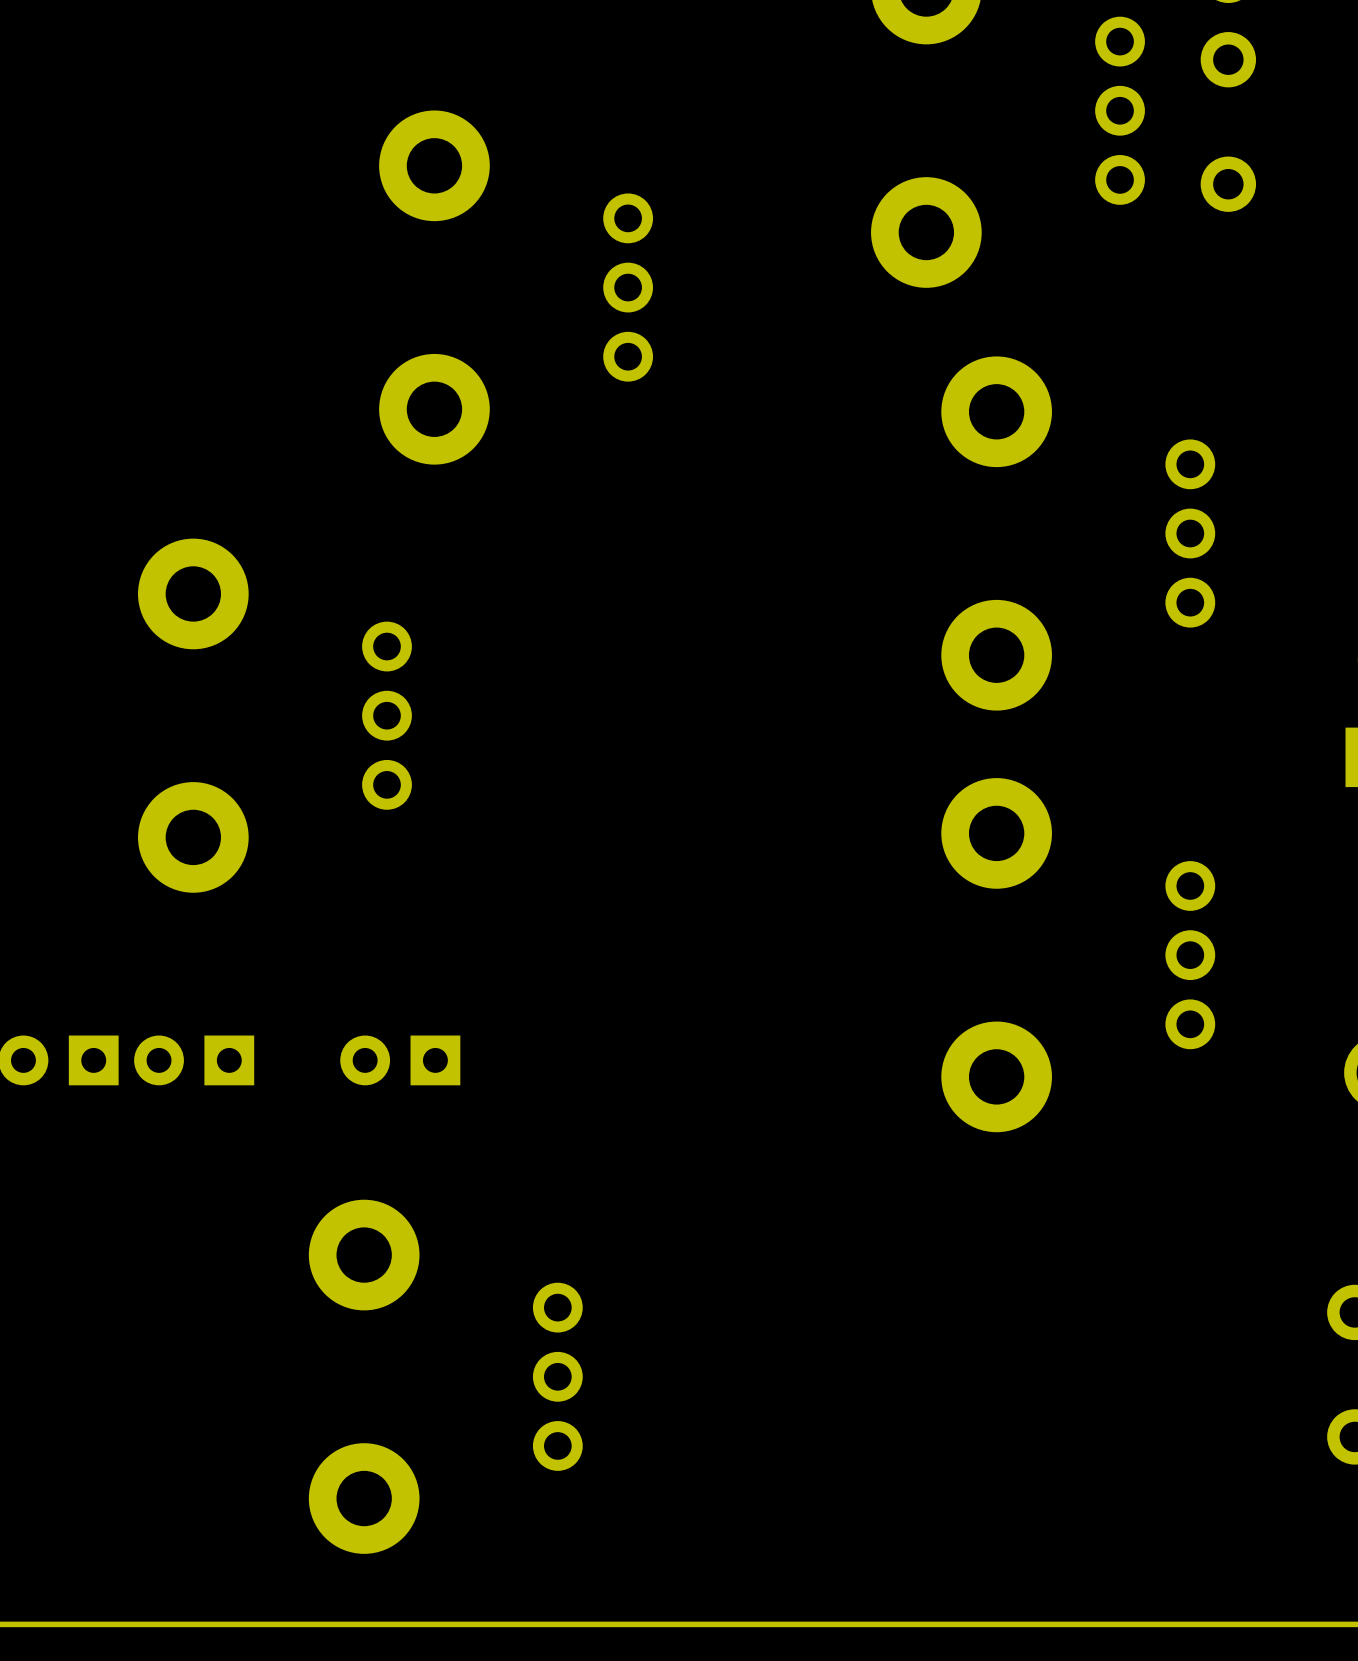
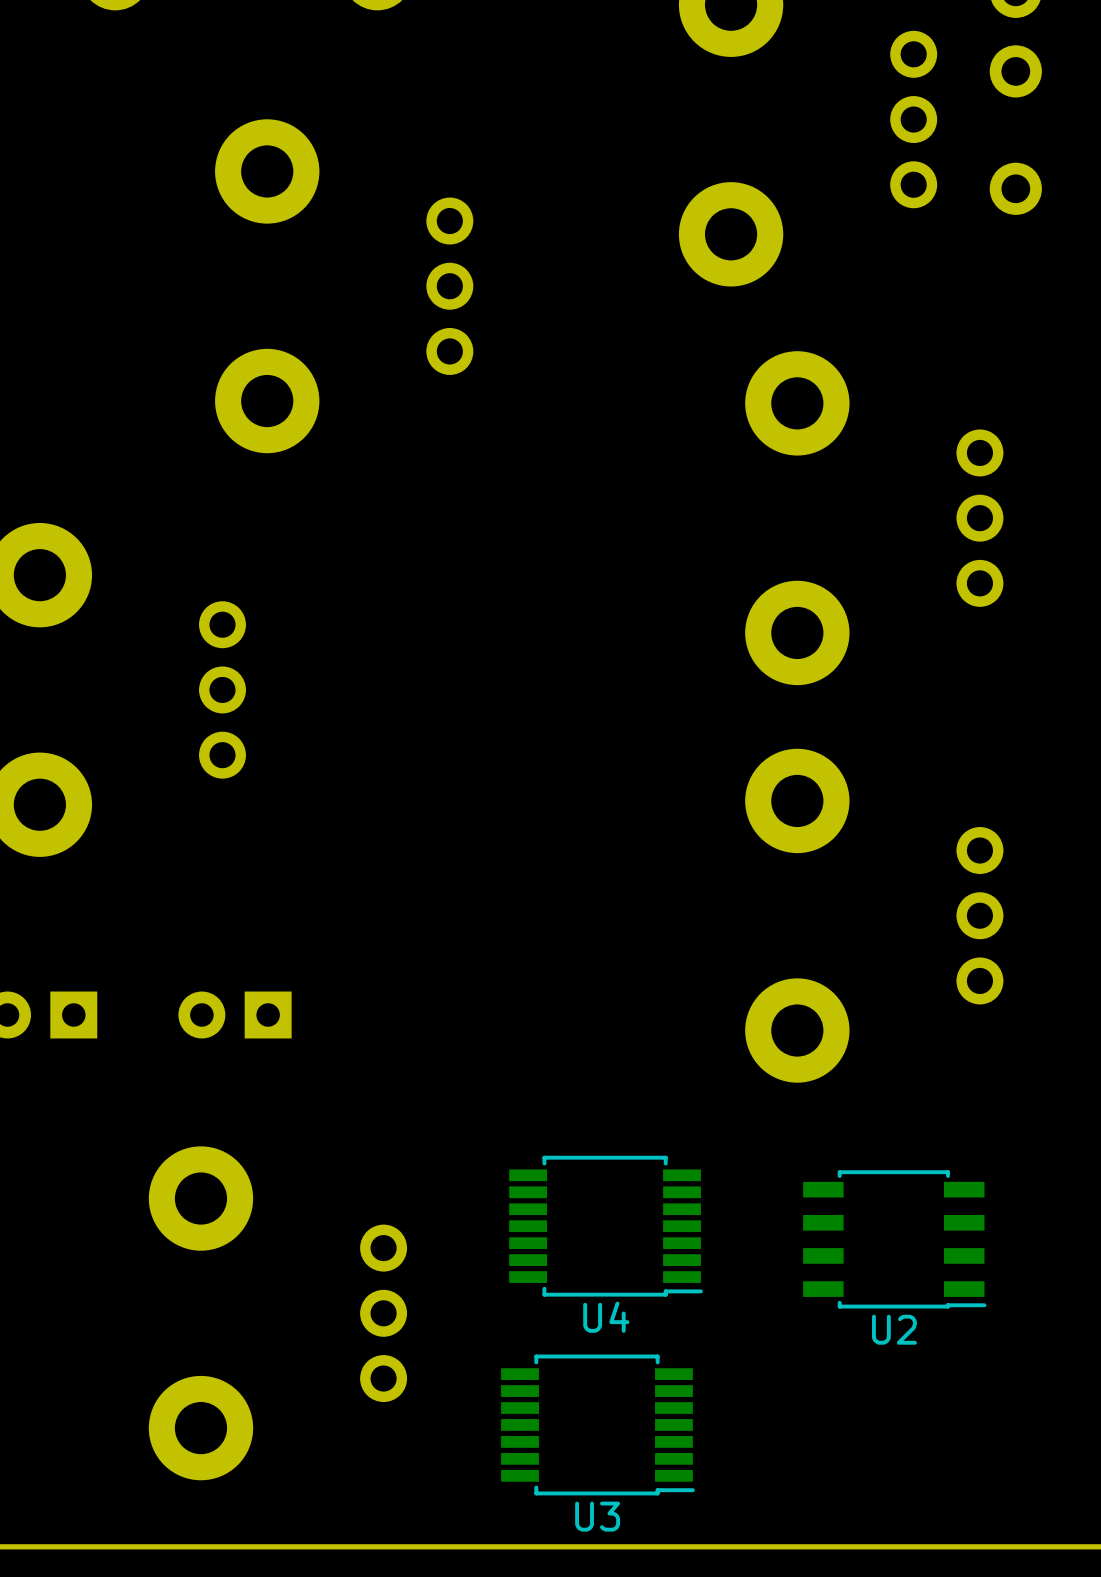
U4: none -> (606, 1226)
U2: none -> (894, 1239)
U3: none -> (597, 1424)

